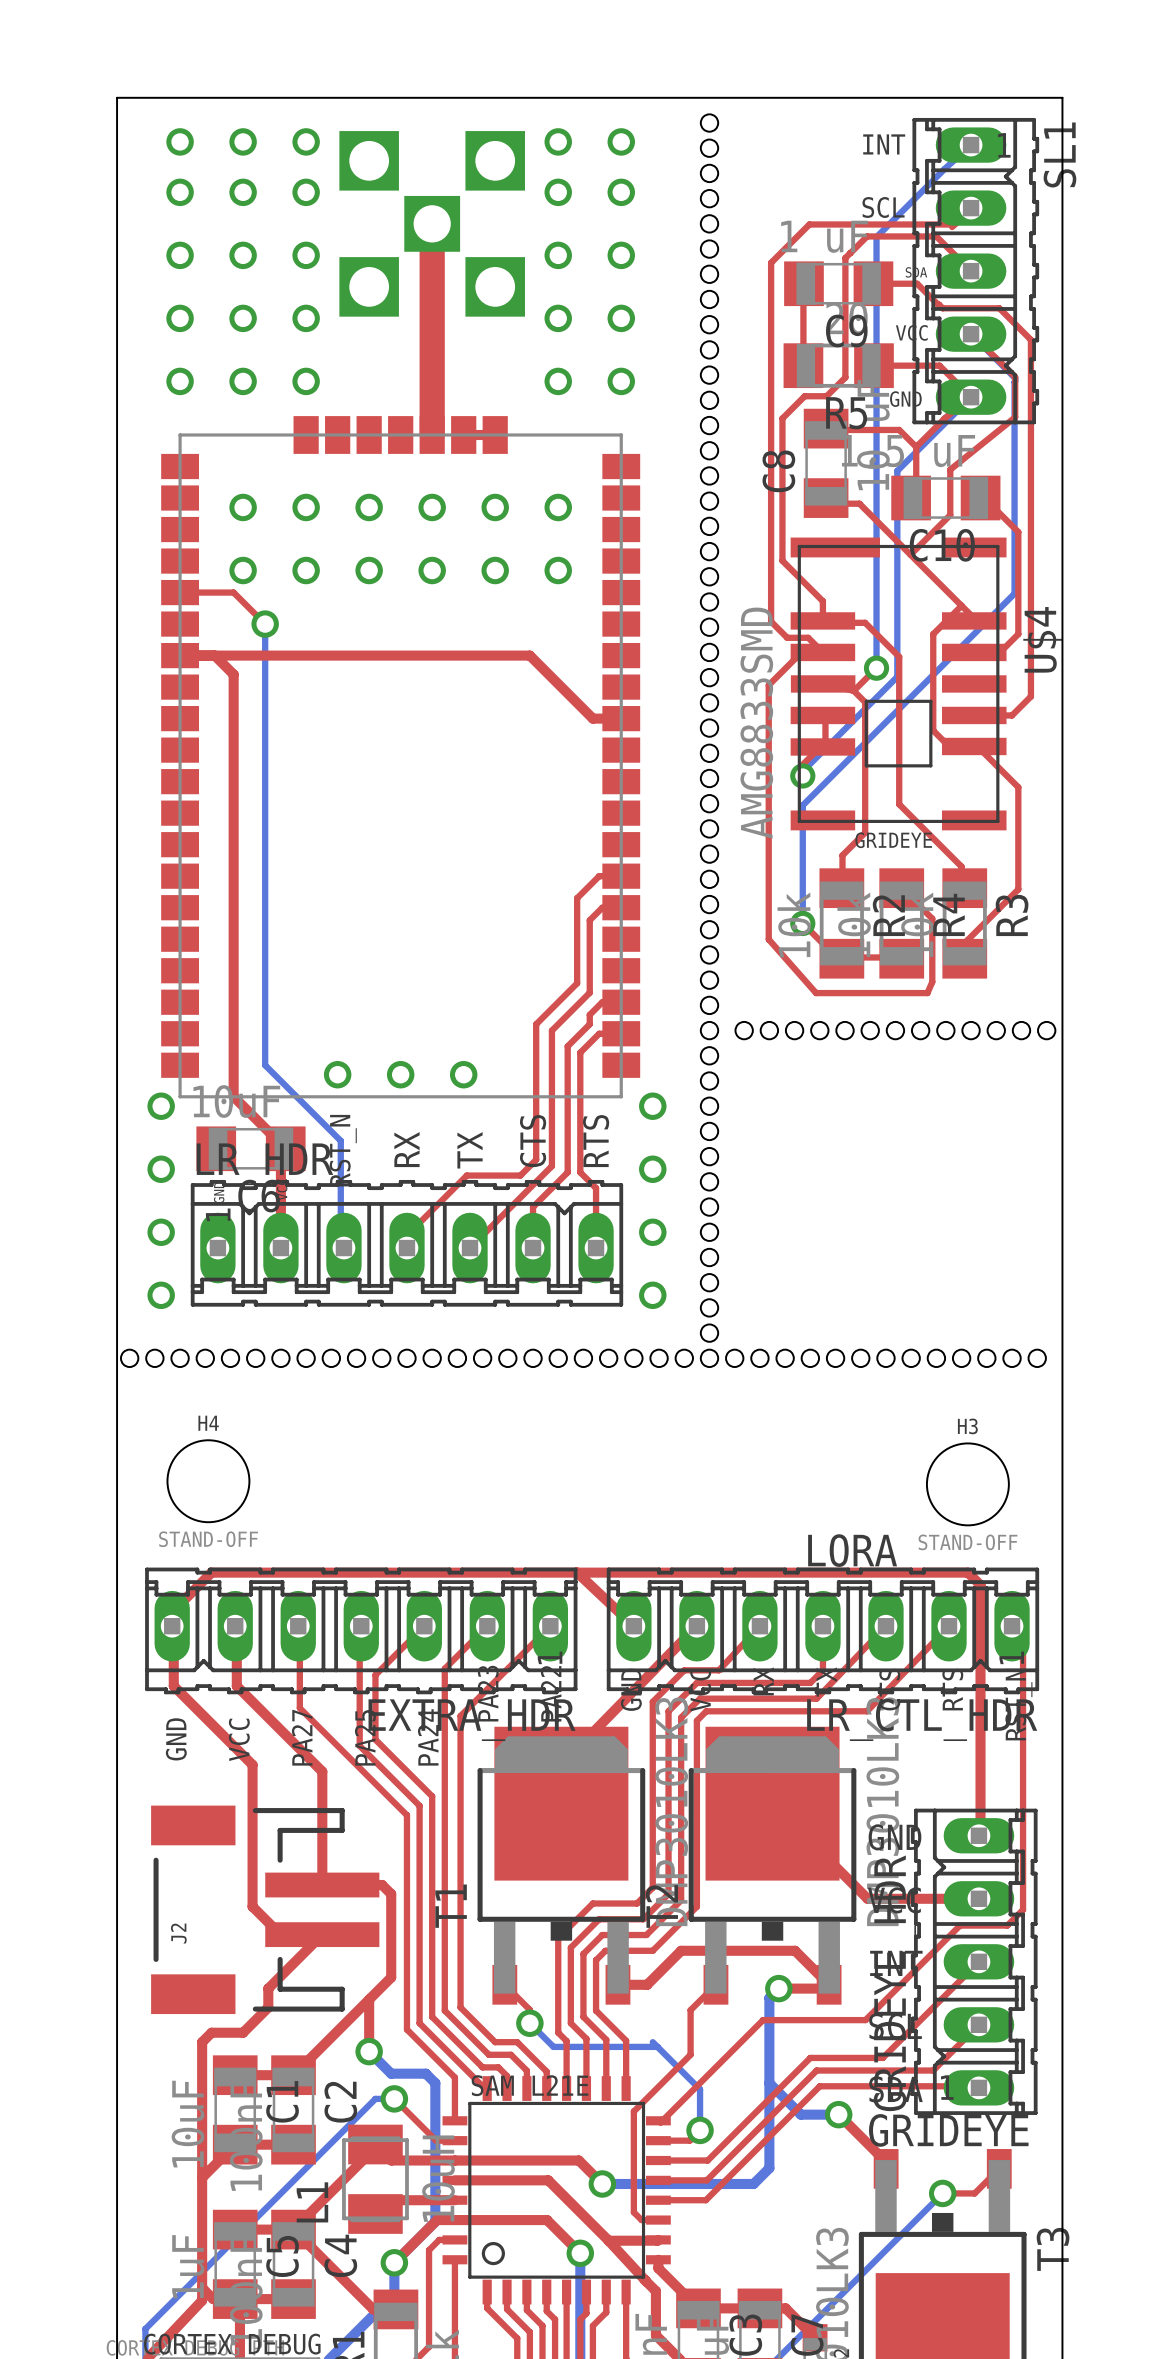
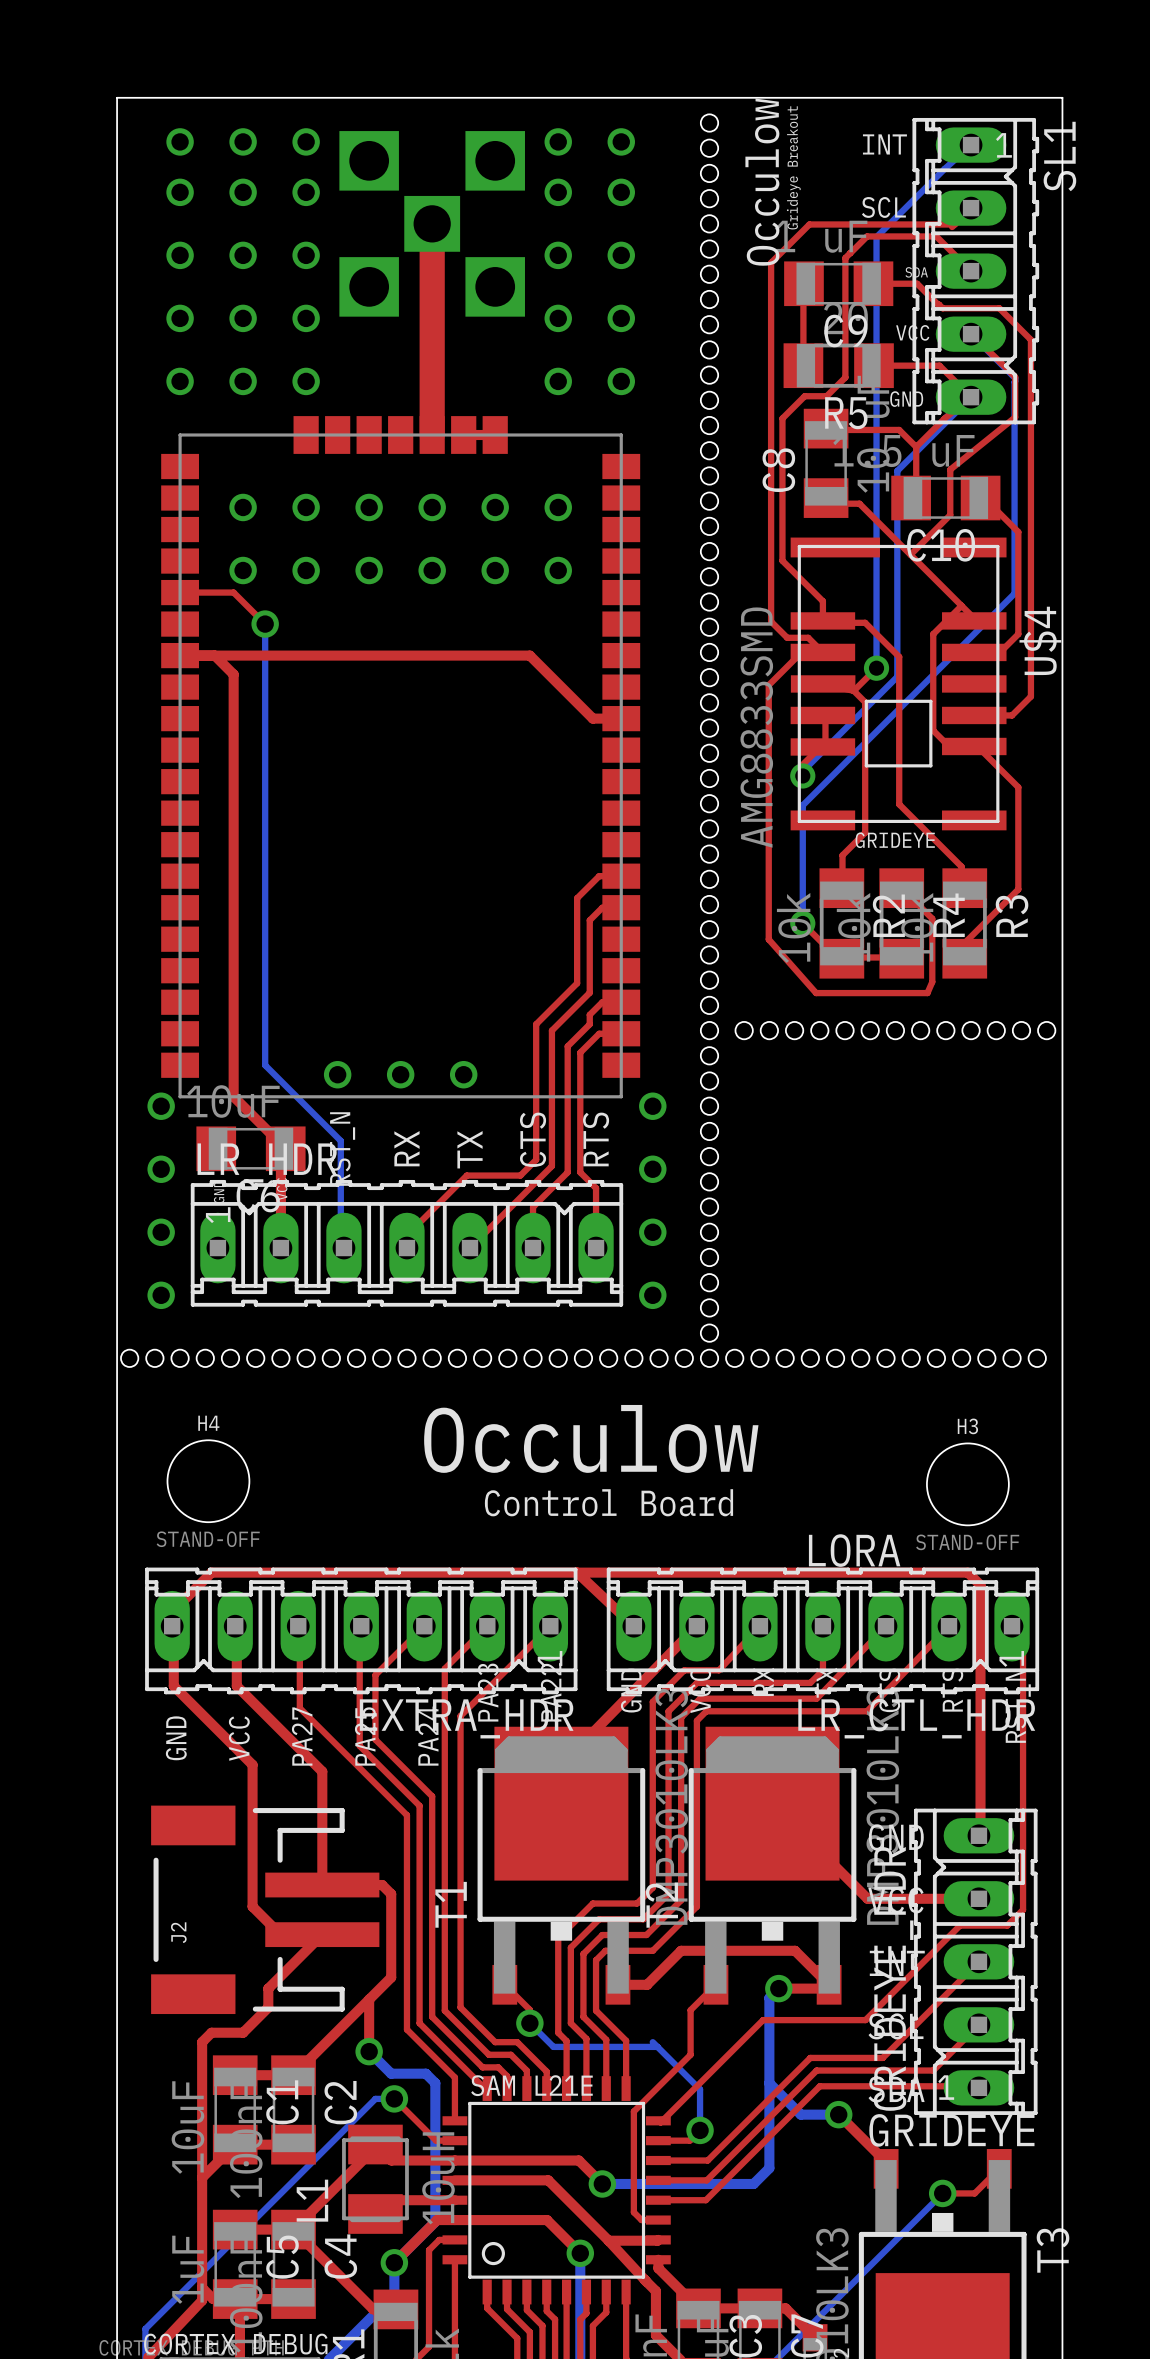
text: none -> Grideye Breakout (793, 167)
text: none -> Occulow (762, 182)
text: none -> Occulow (591, 1438)
text: none -> Control Board (608, 1502)

